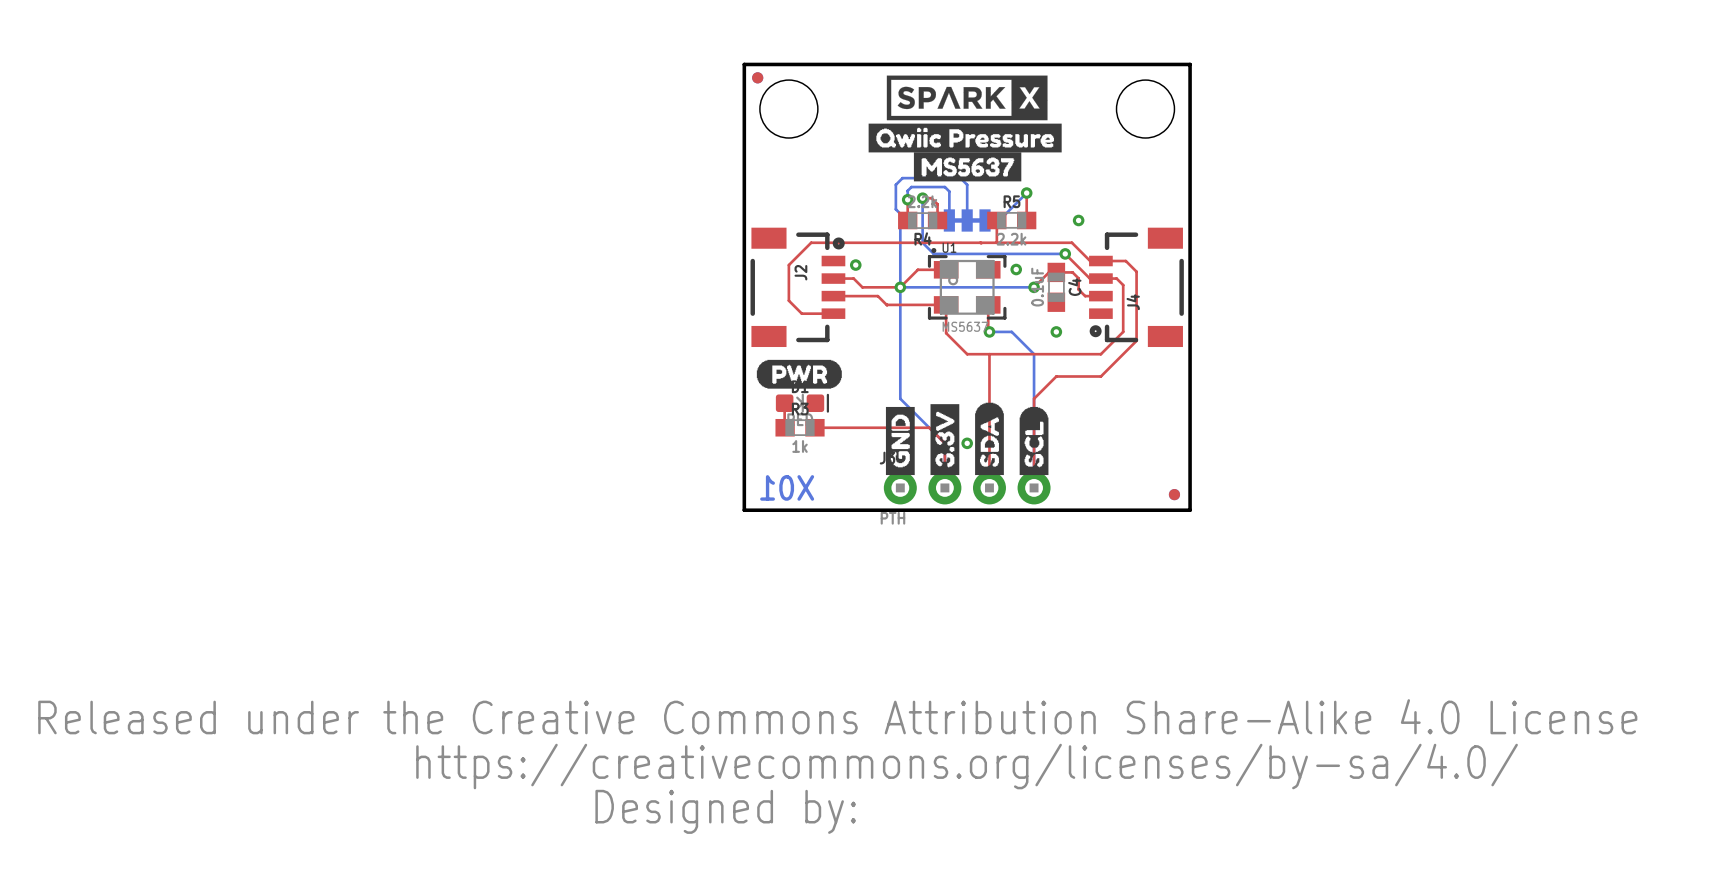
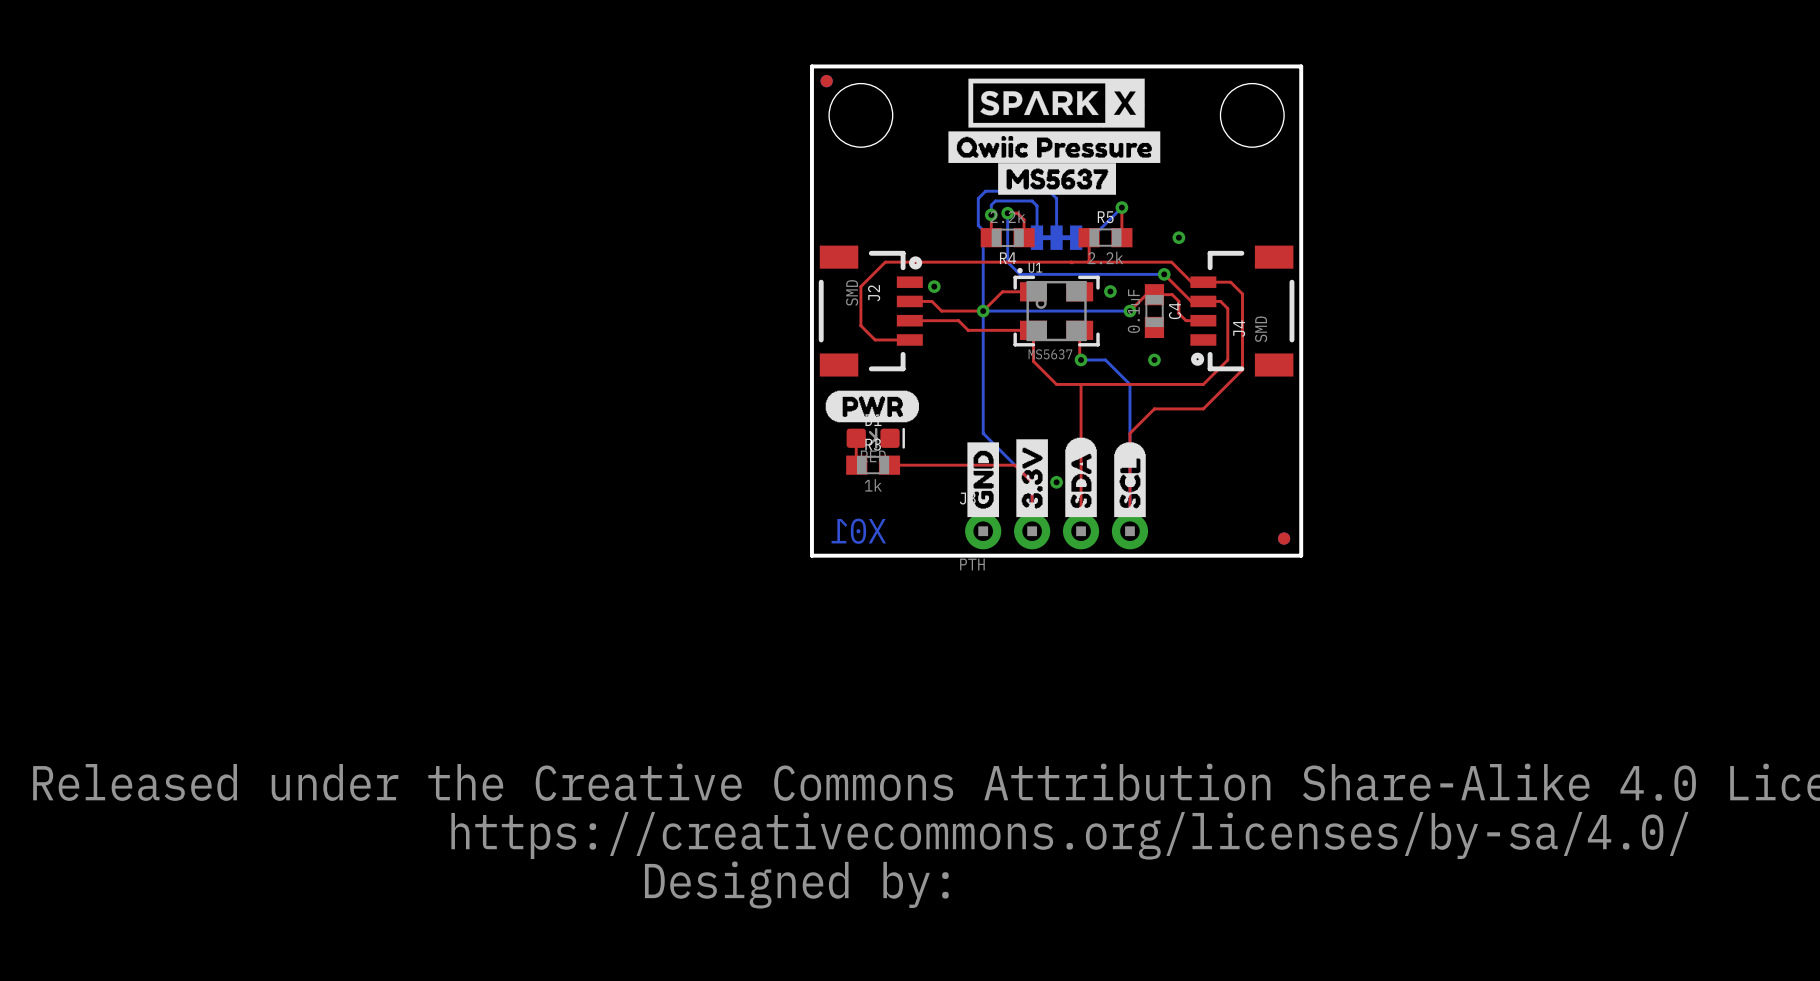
J2 value: none -> SMD (852, 292)
J4 value: none -> SMD (1261, 329)

